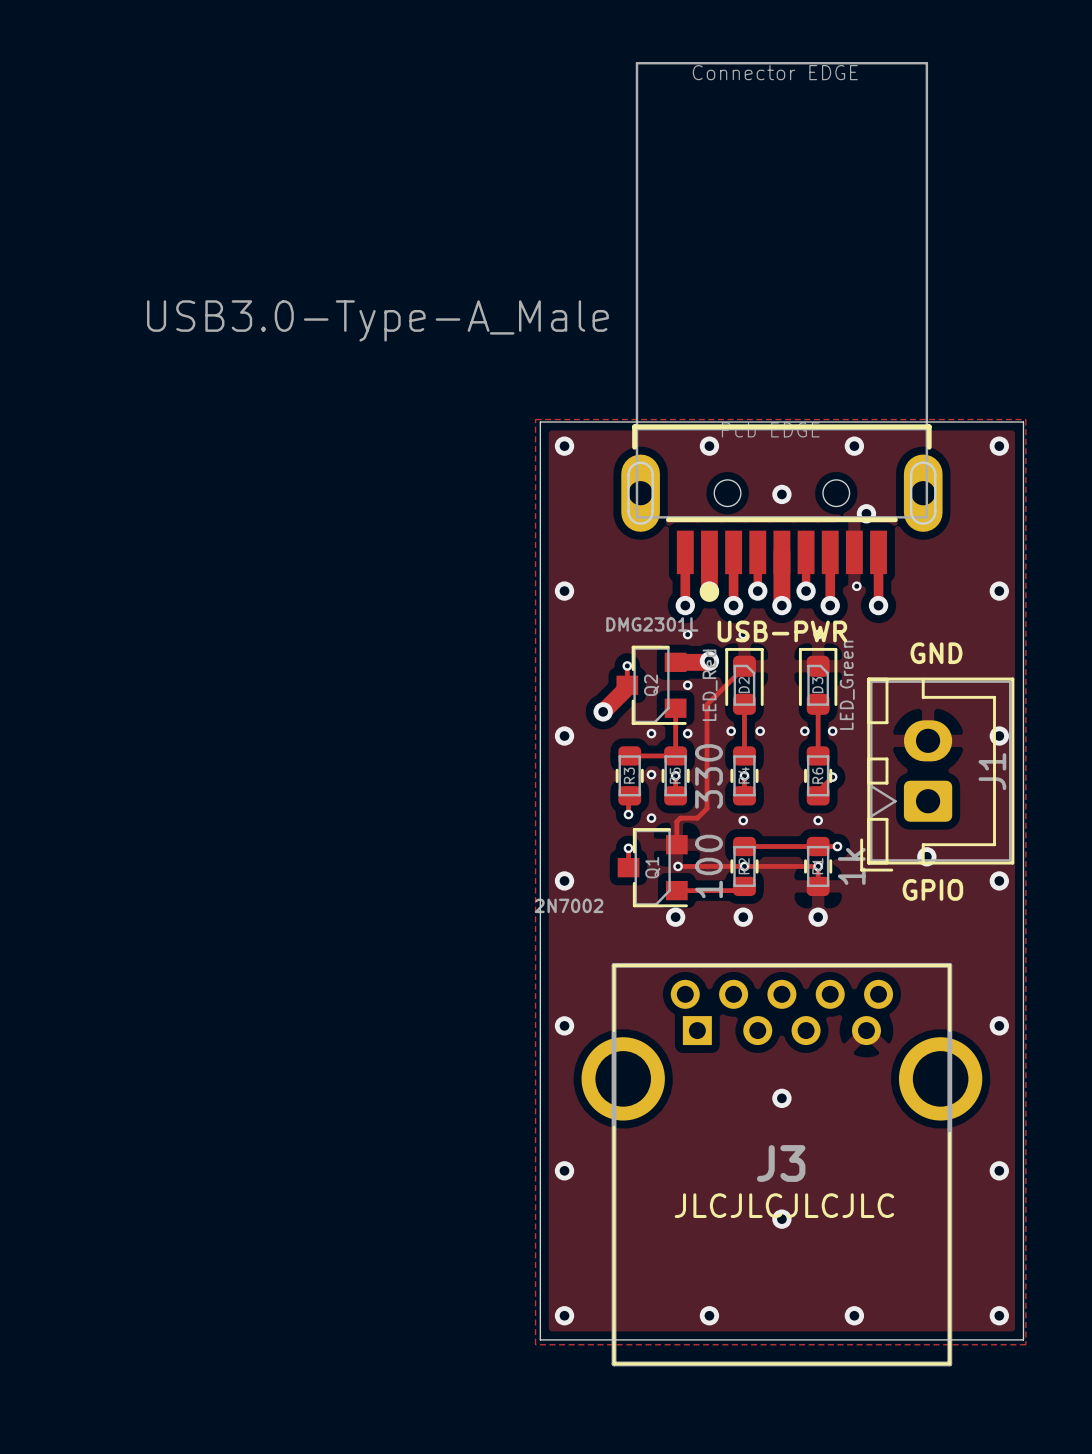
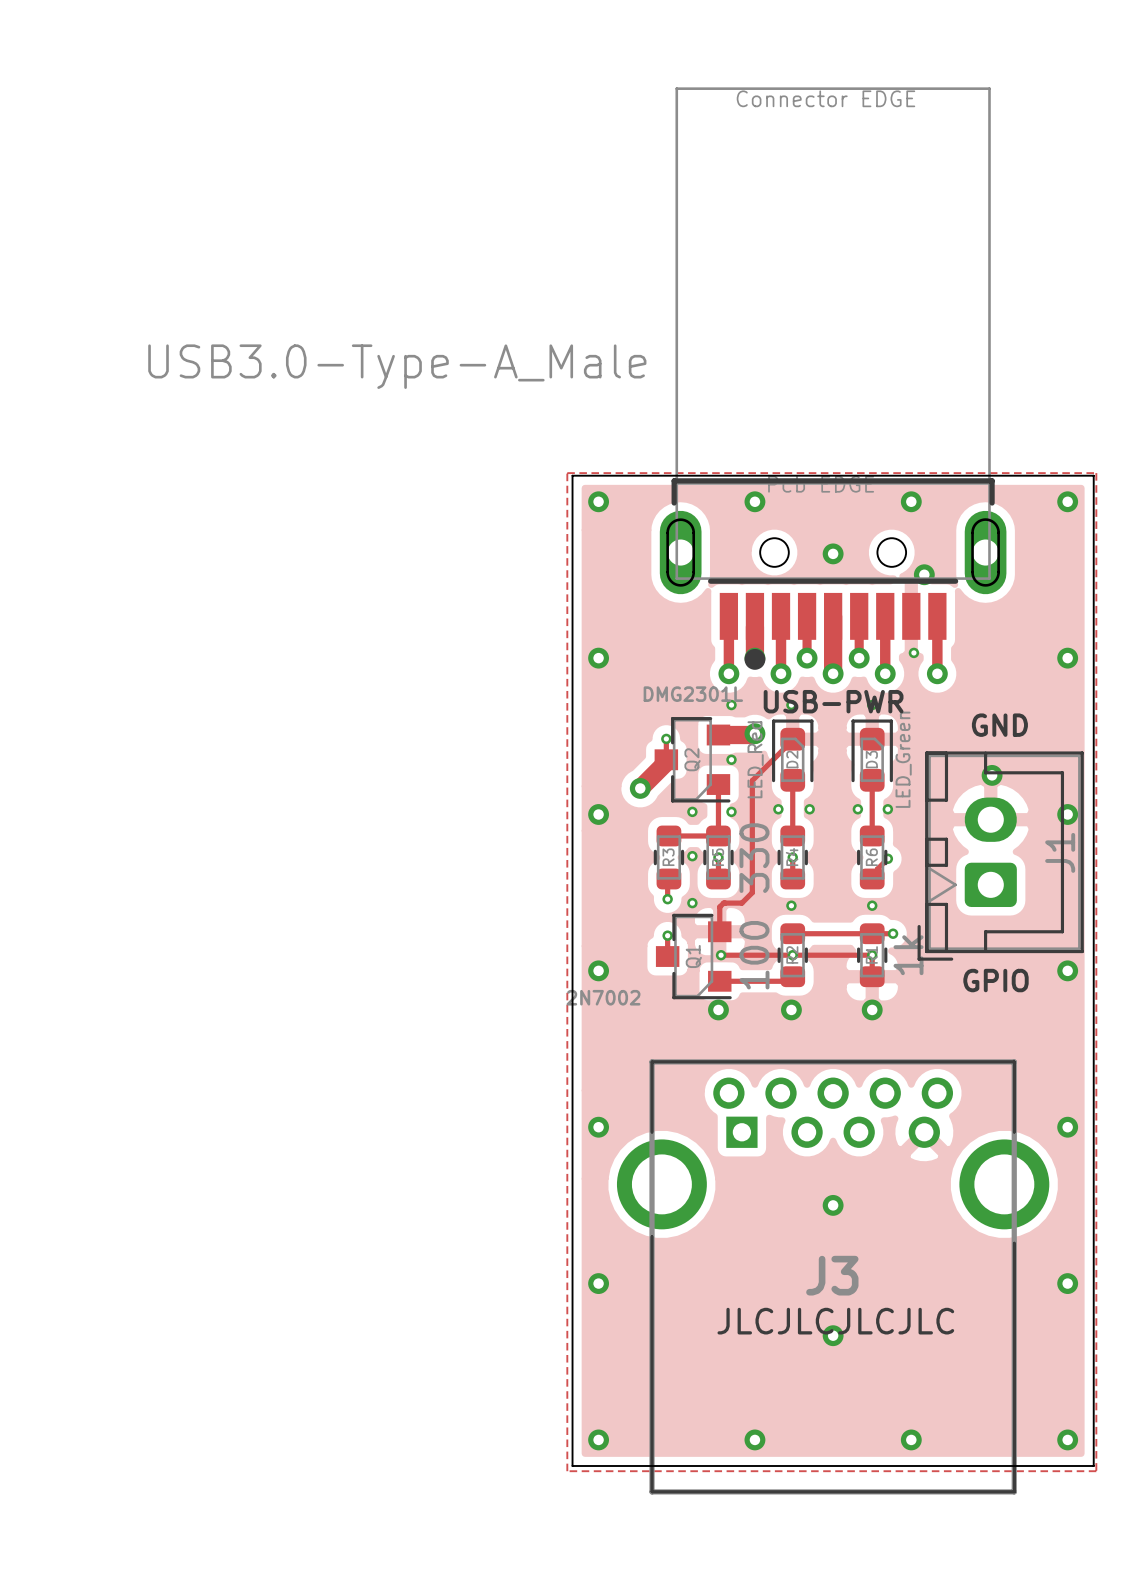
via: none -> (992, 775)
via: (926, 856) -> none

